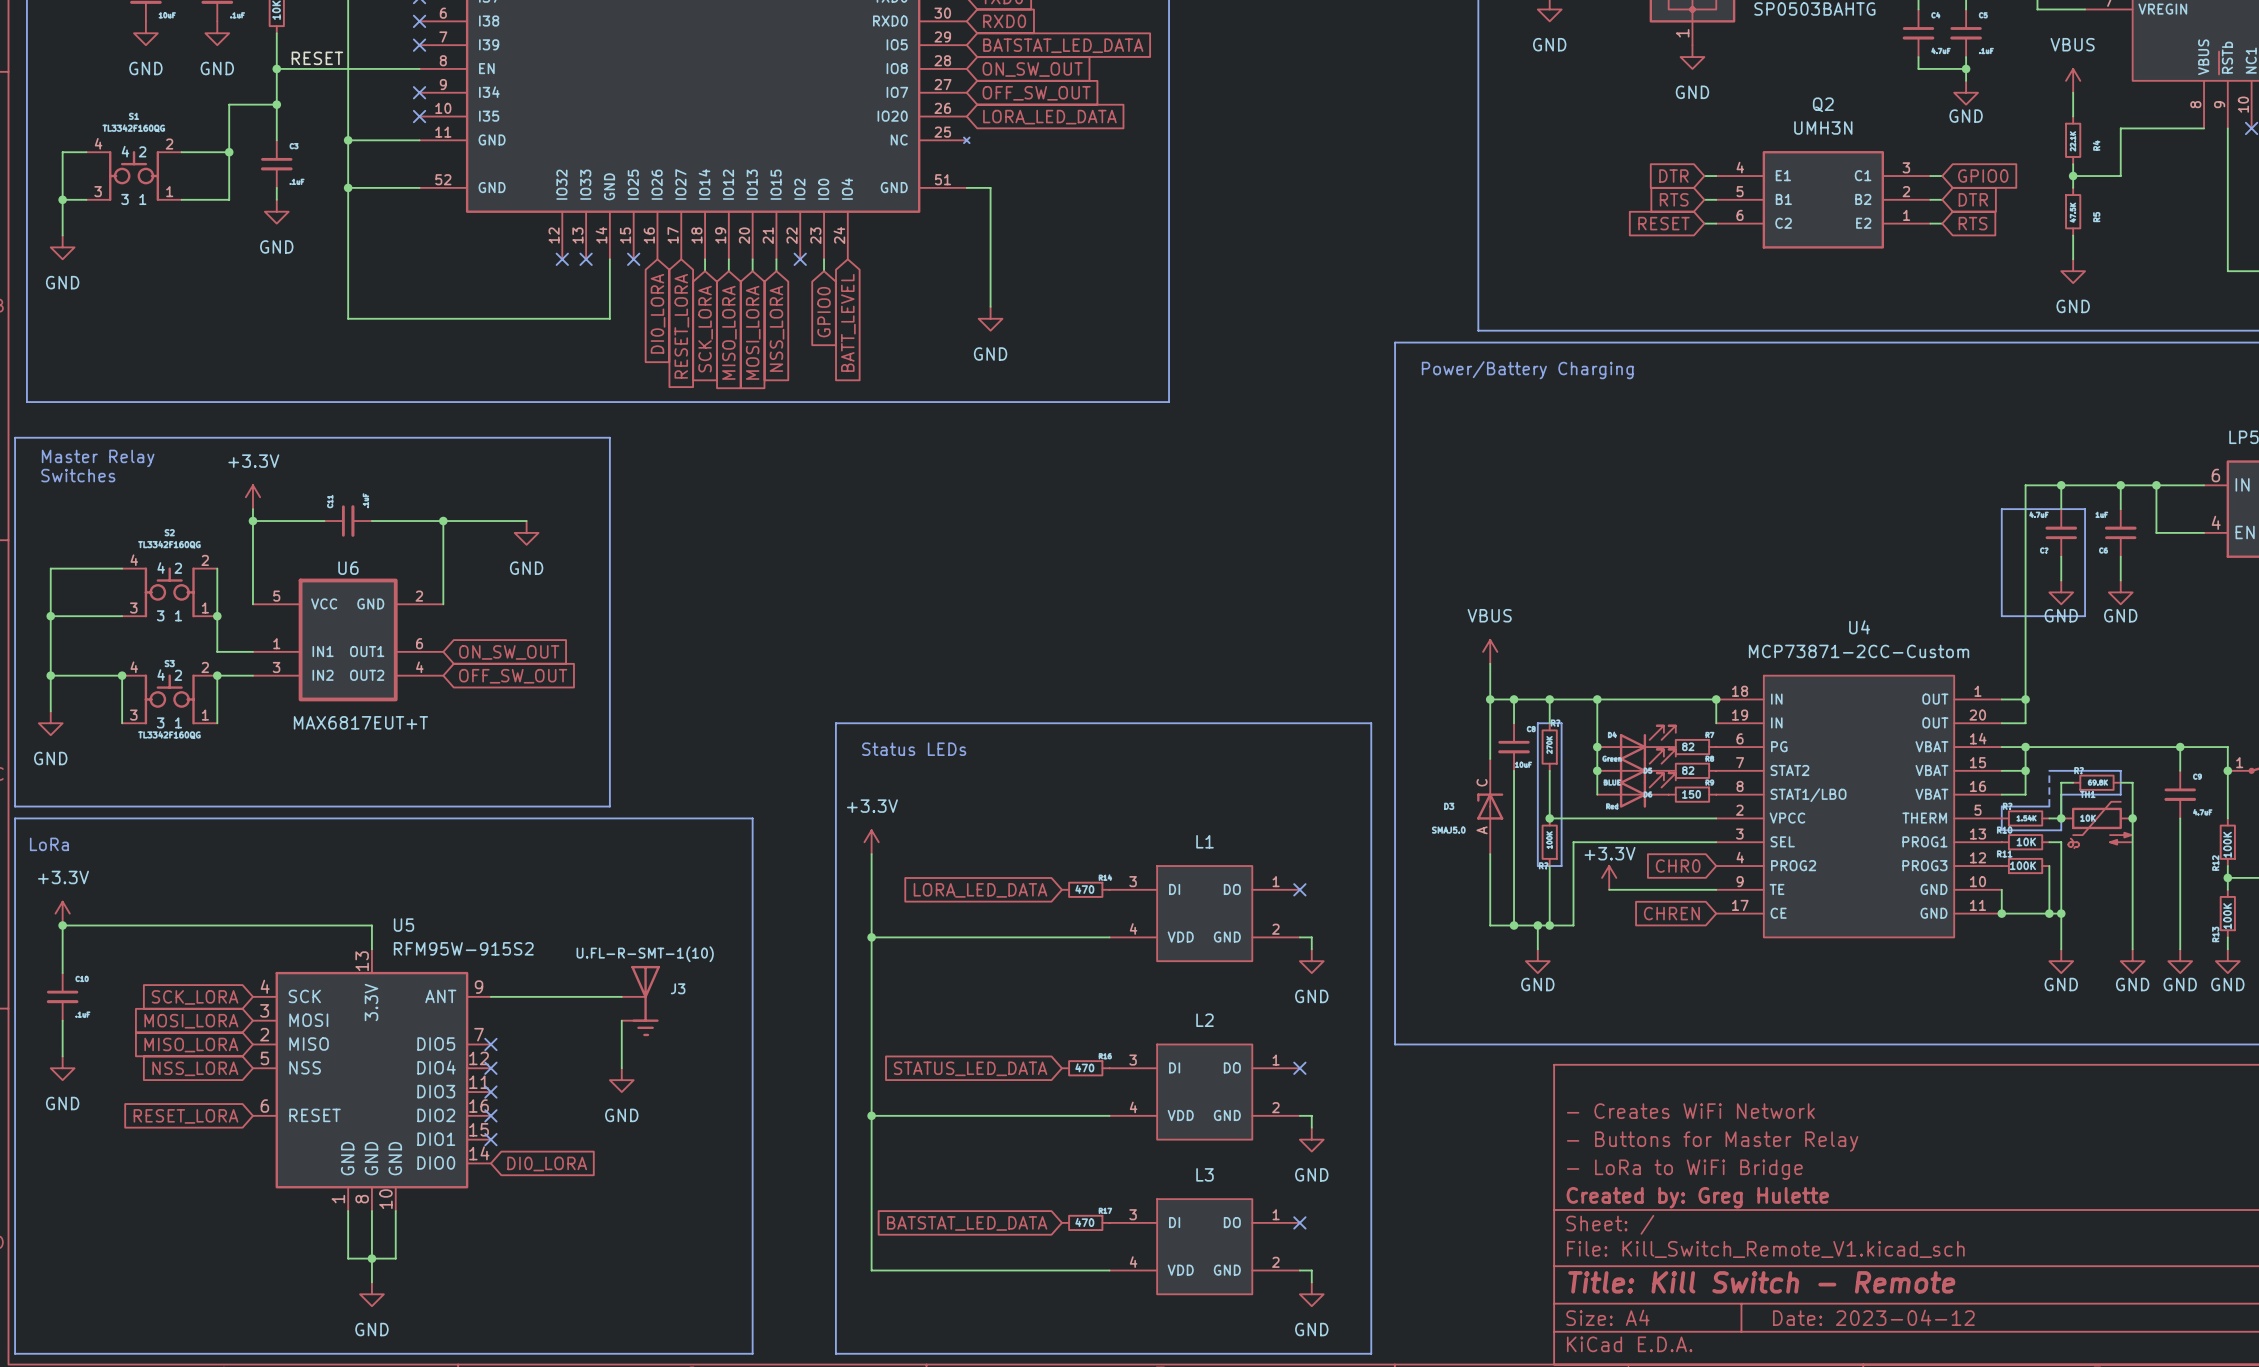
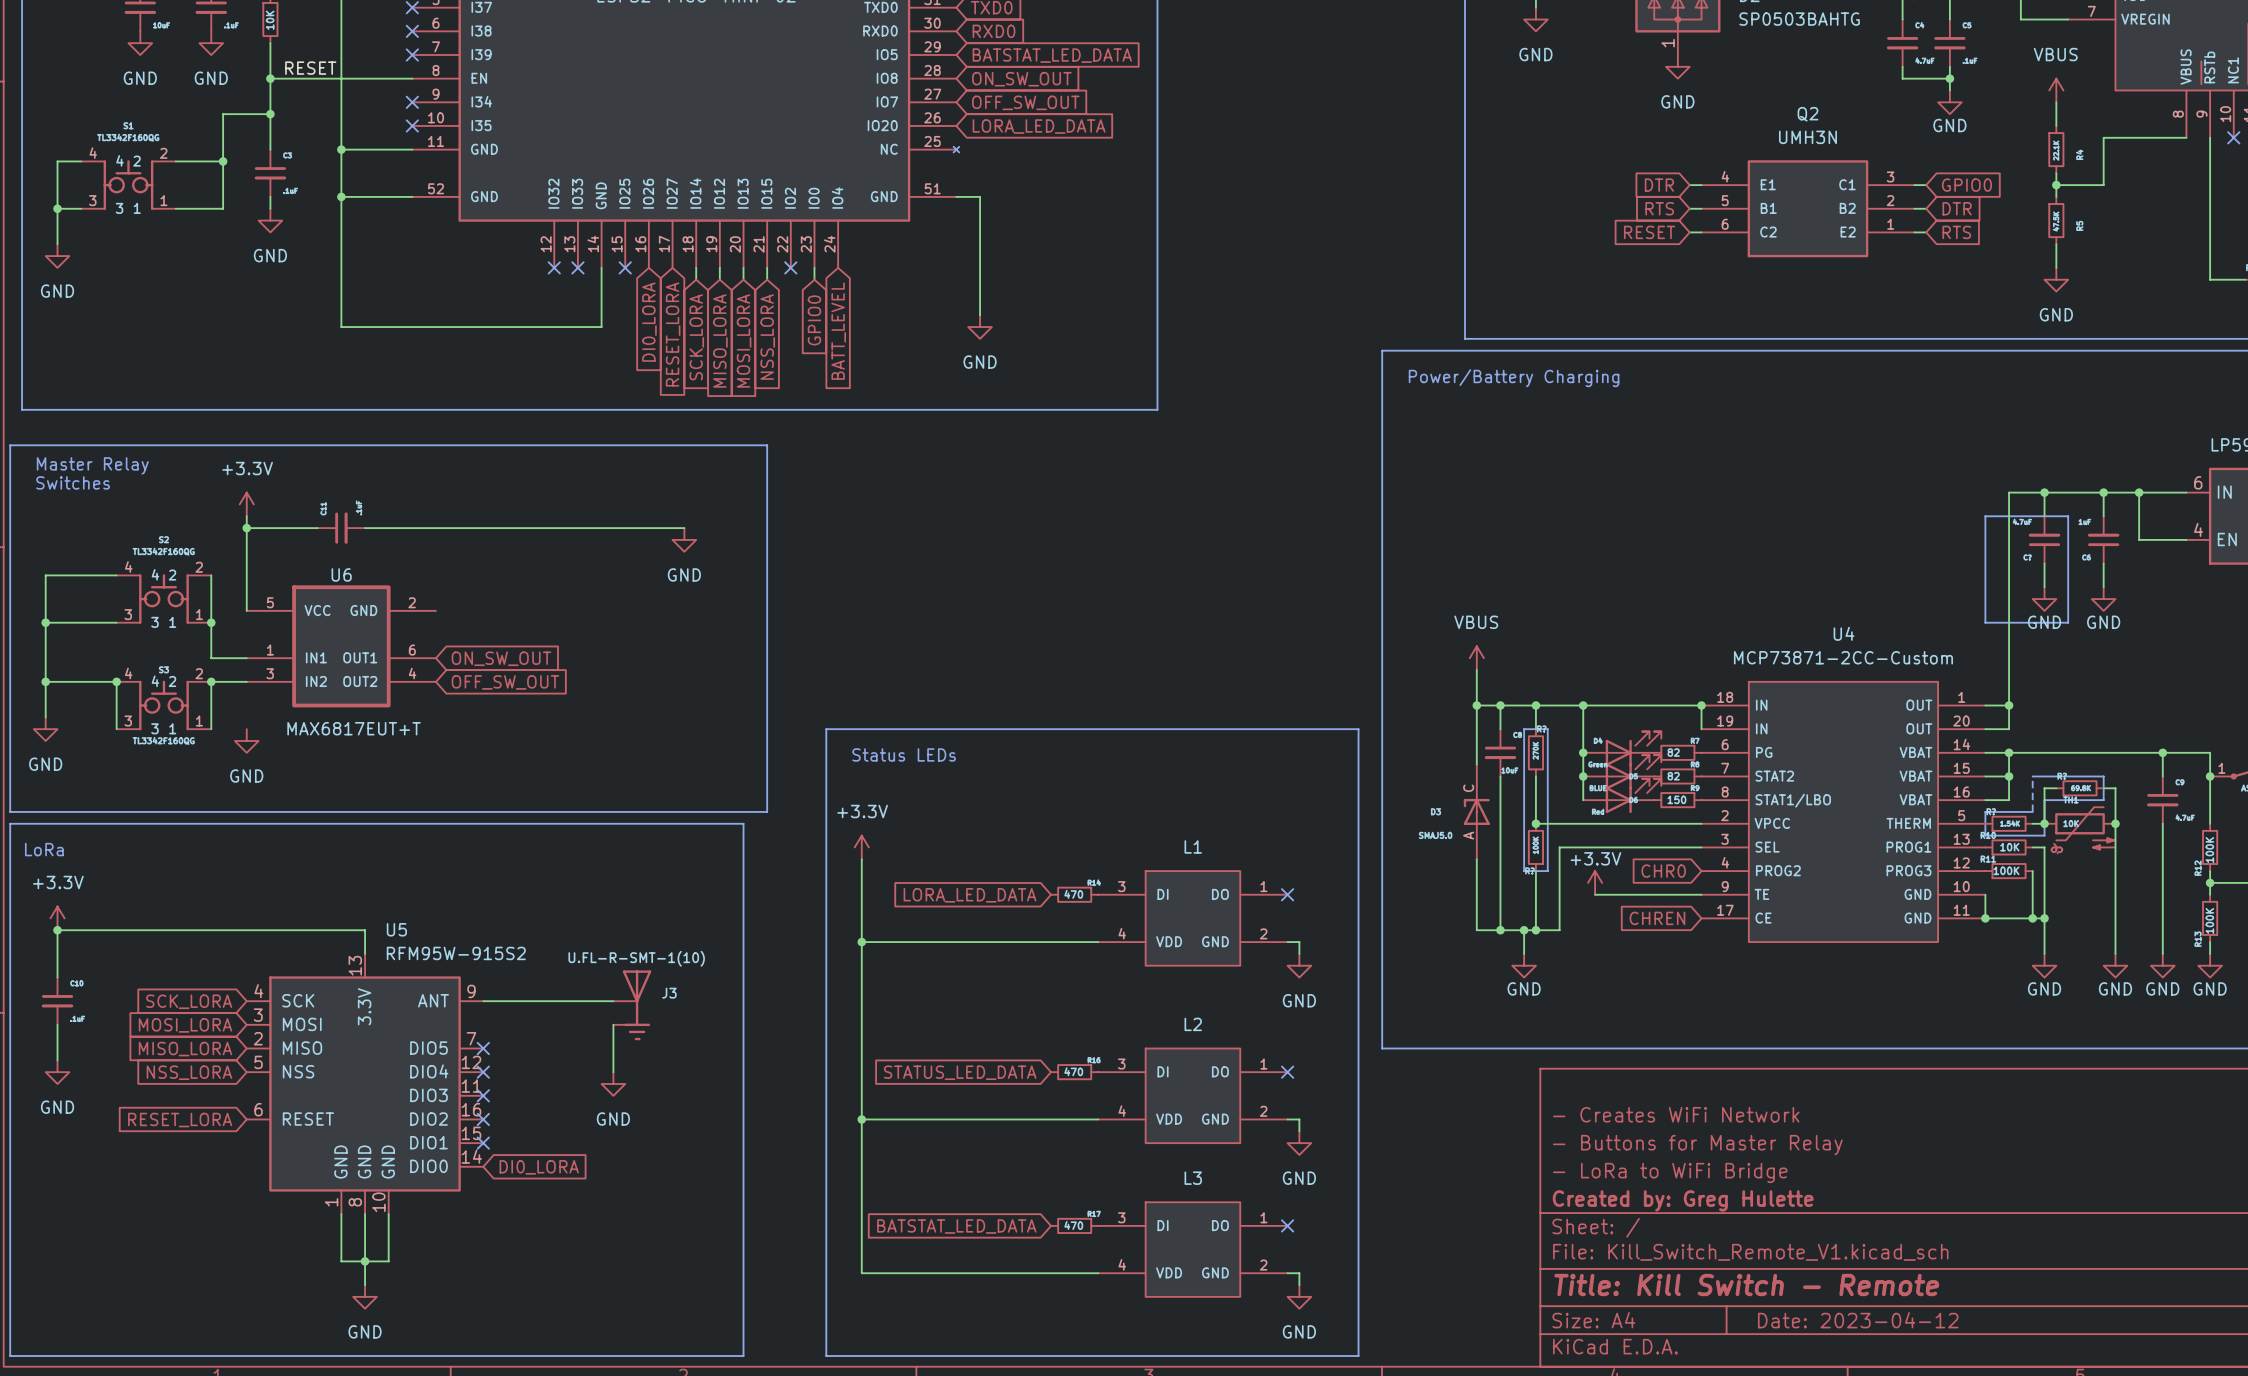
line: (609, 437) (609, 806) -> (601, 445) (767, 445) (767, 811) (601, 811)
wire: (443, 521) (443, 604) -> none
junction: (443, 521) -> none
wire: none -> (518, 528) (684, 528)
power symbol position: GND (526, 532) -> GND (684, 539)
power symbol: none -> GND (246, 740)

